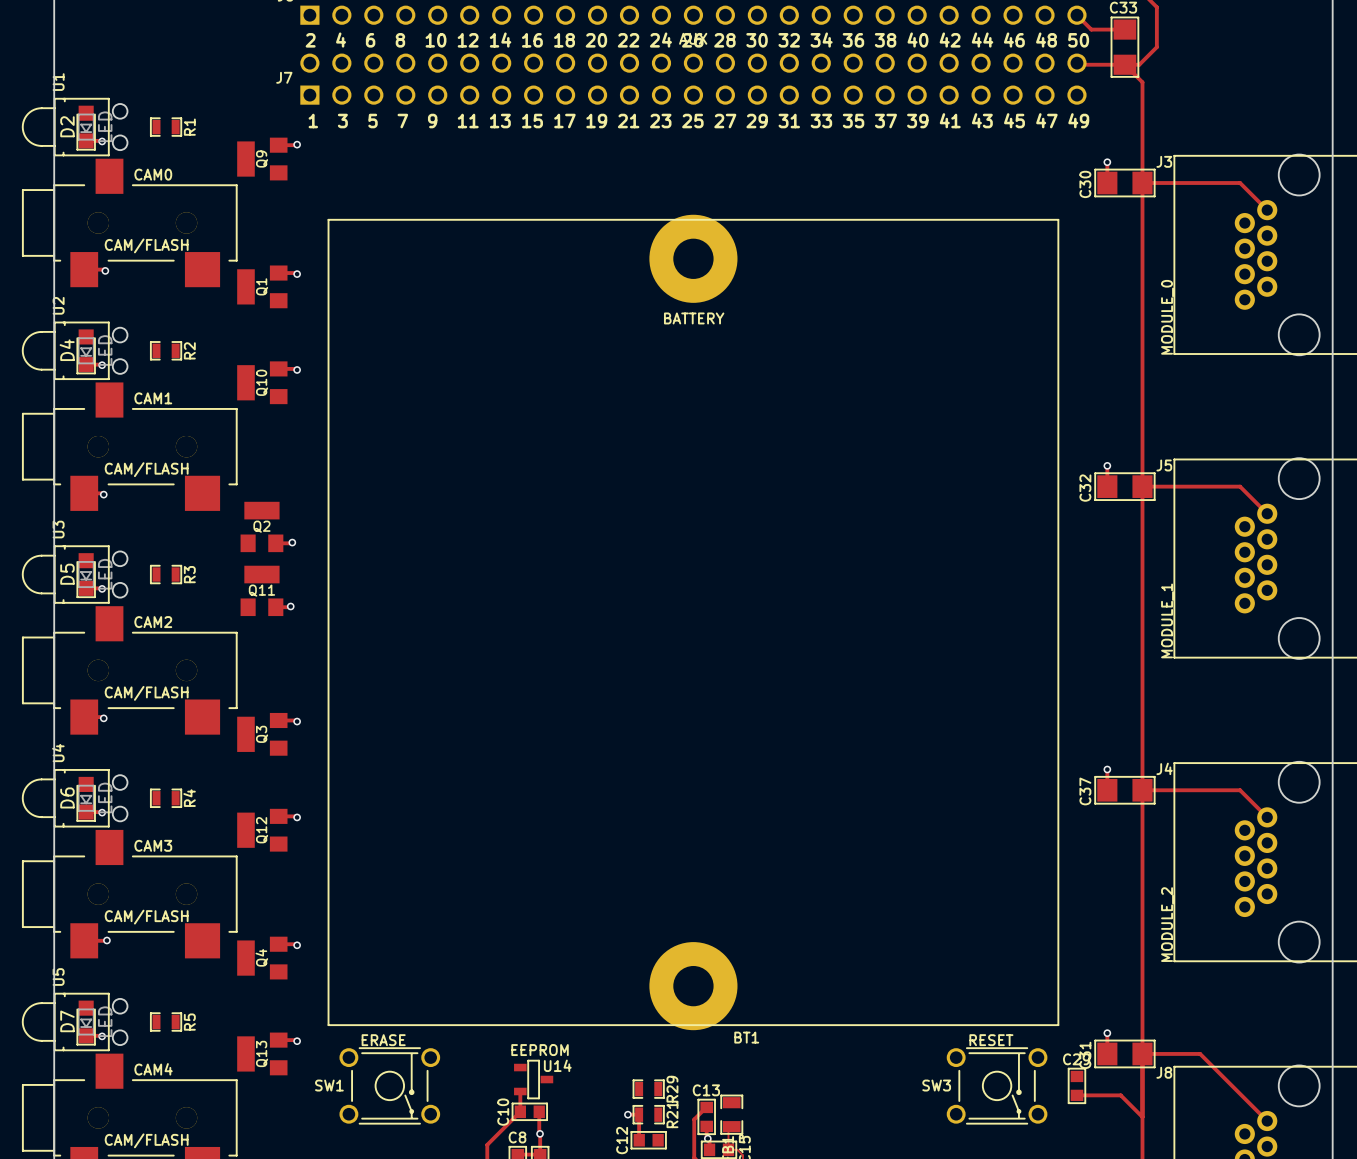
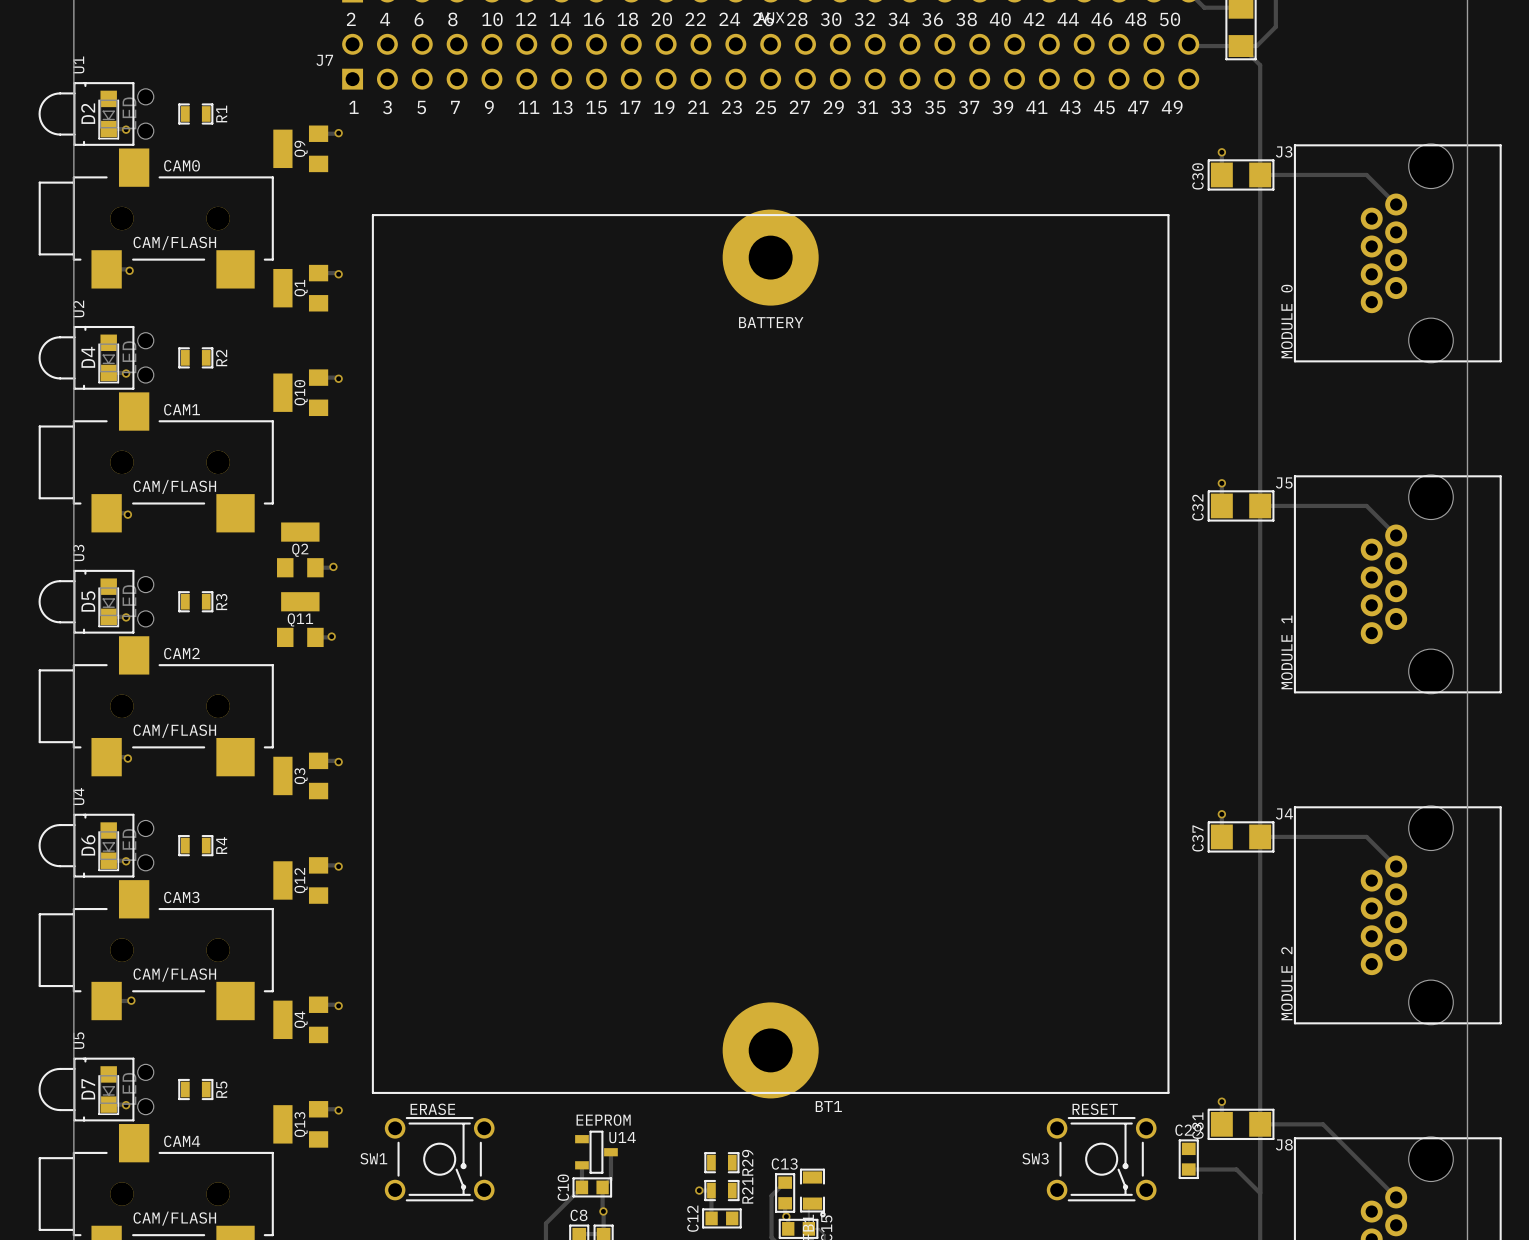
track: none -> (610, 1152) (610, 1179) (602, 1187)

